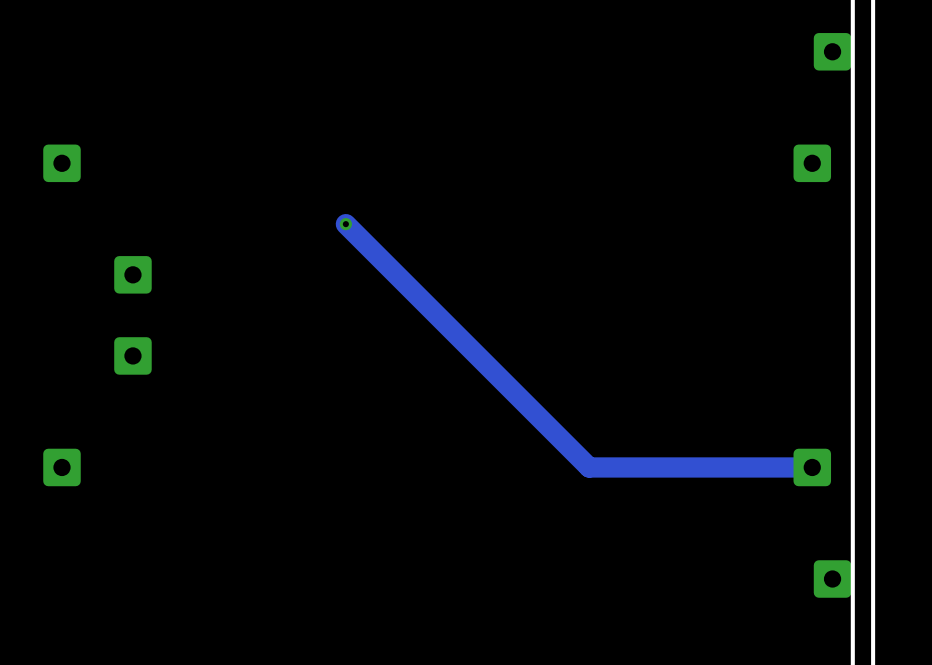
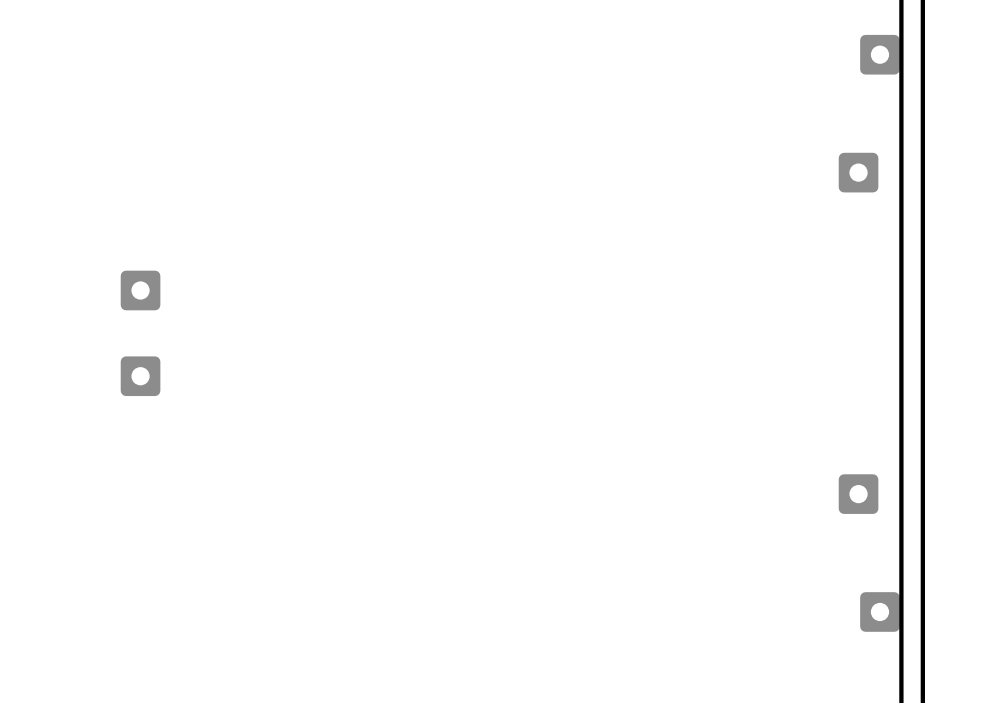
part: (61, 163) -> none
track: (345, 224) (589, 467) (812, 467) -> none
via: (345, 224) -> none
part: (61, 467) -> none

